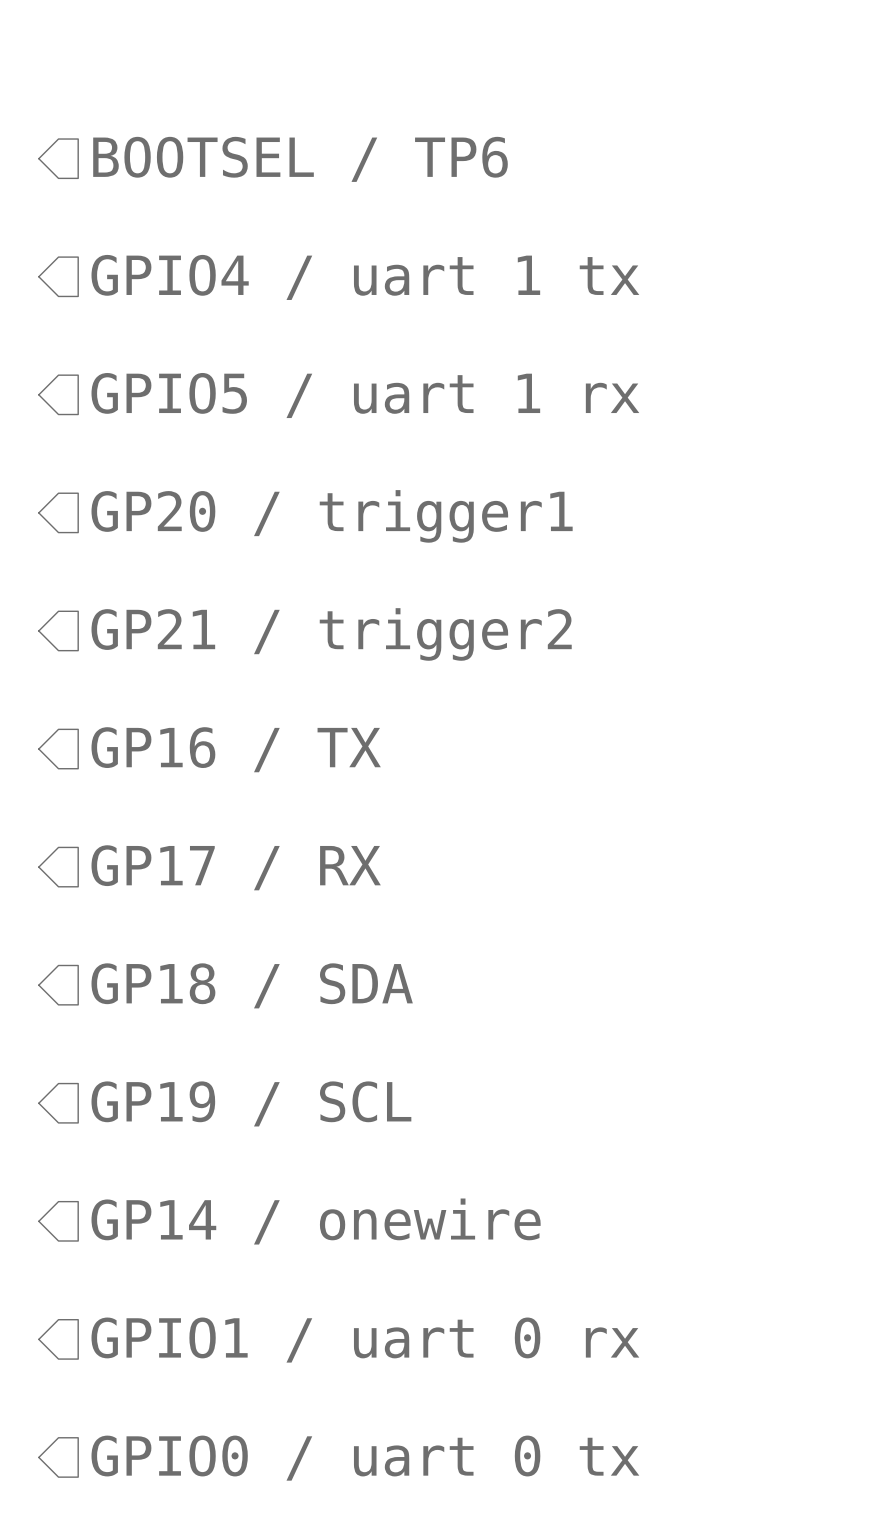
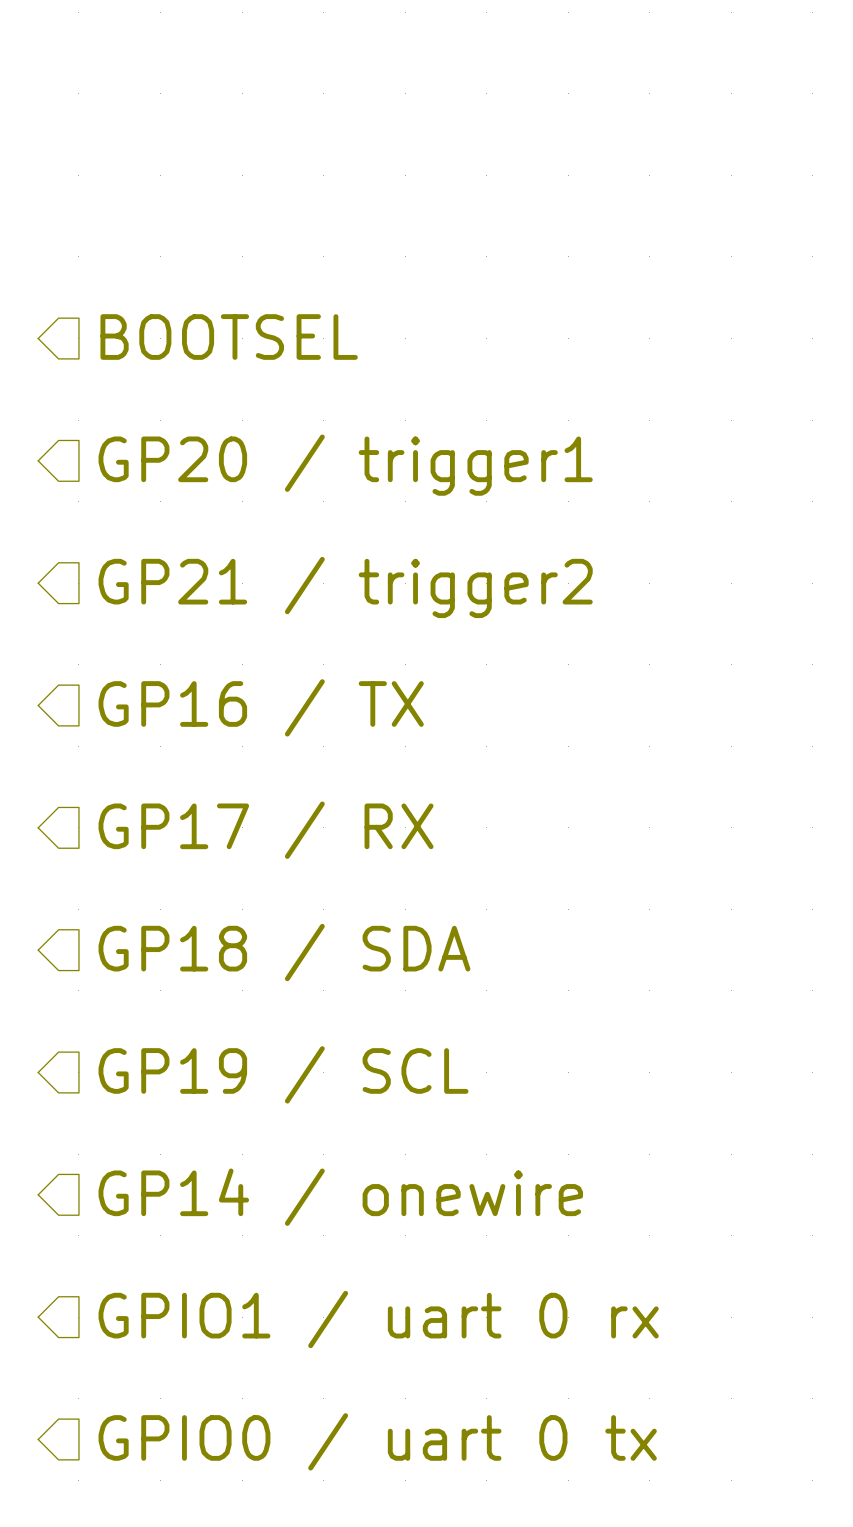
hierarchical label: BOOTSEL / TP6 (300, 159) -> none
hierarchical label: GPIO4 / uart 1 tx (365, 277) -> none
hierarchical label: GPIO5 / uart 1 rx (365, 395) -> BOOTSEL (229, 337)

